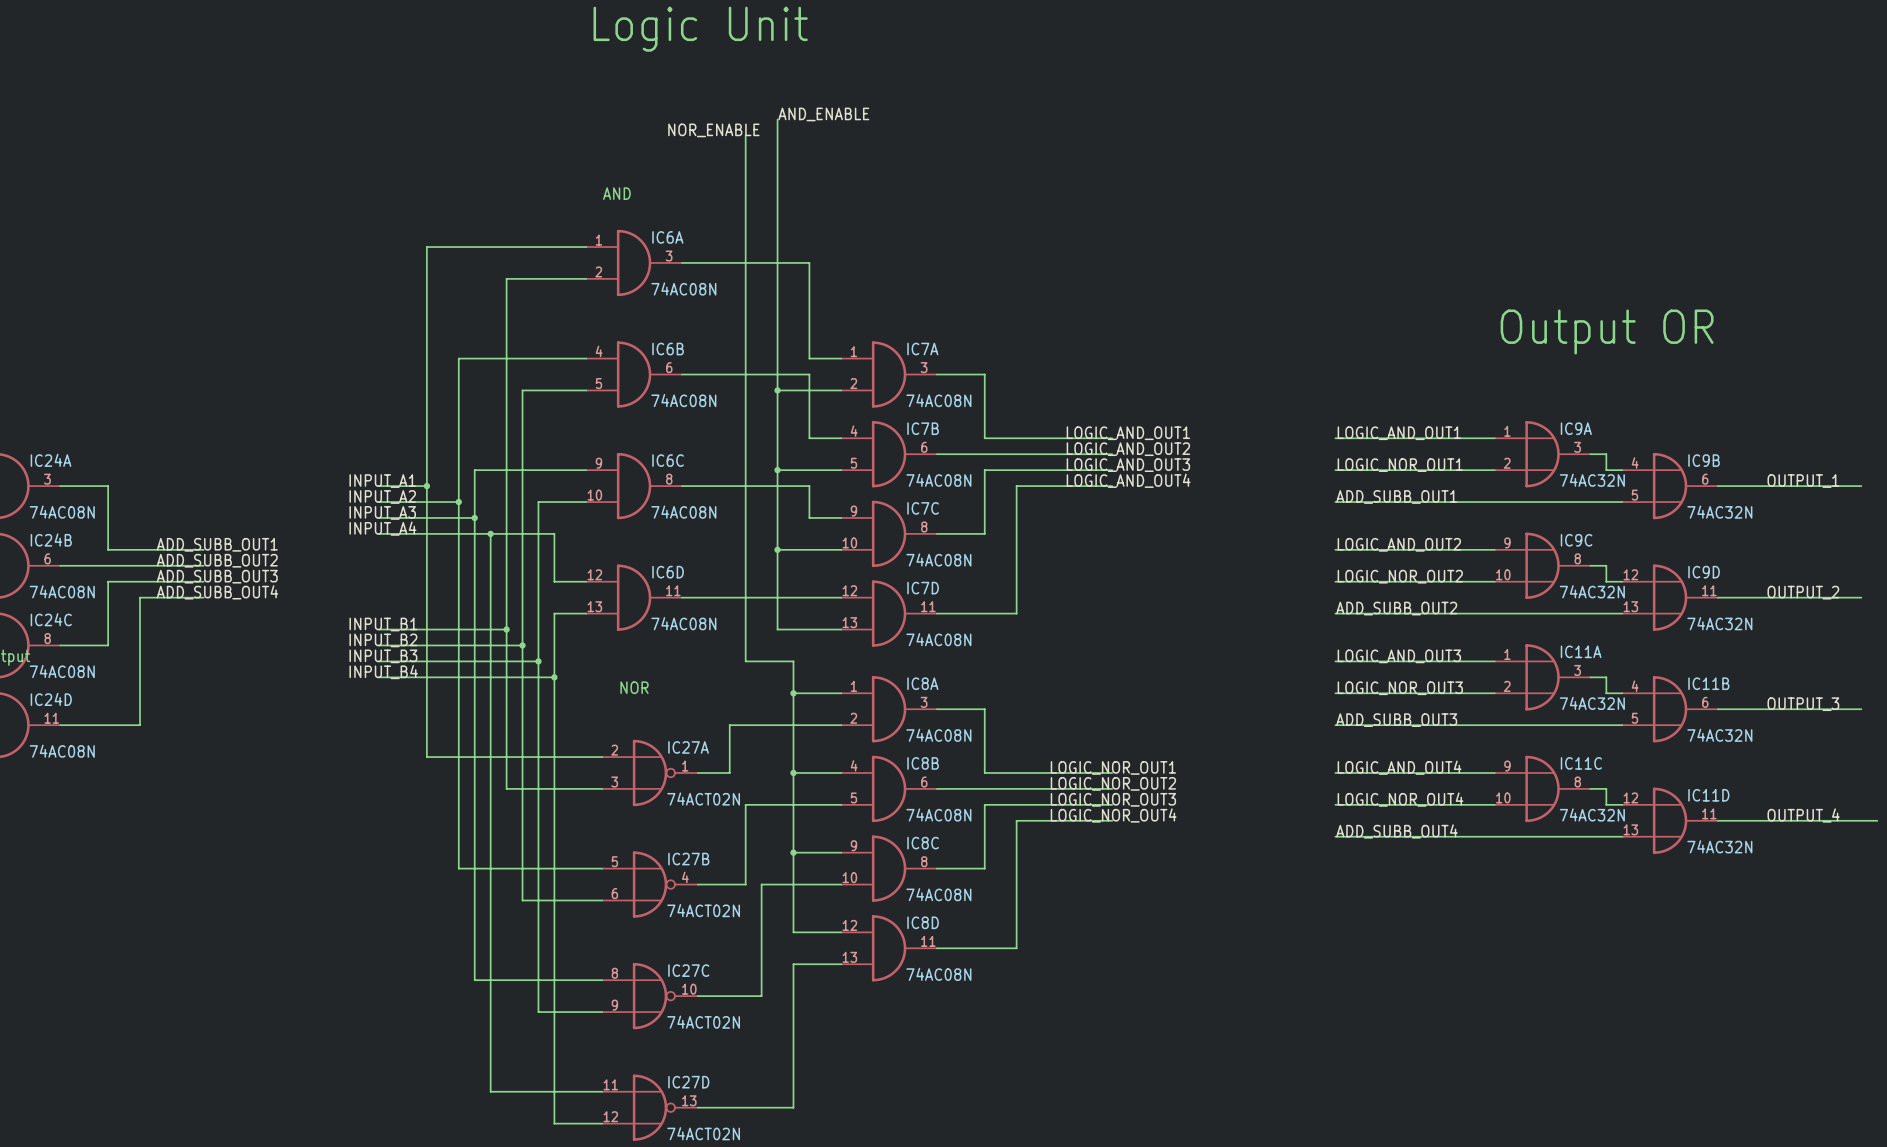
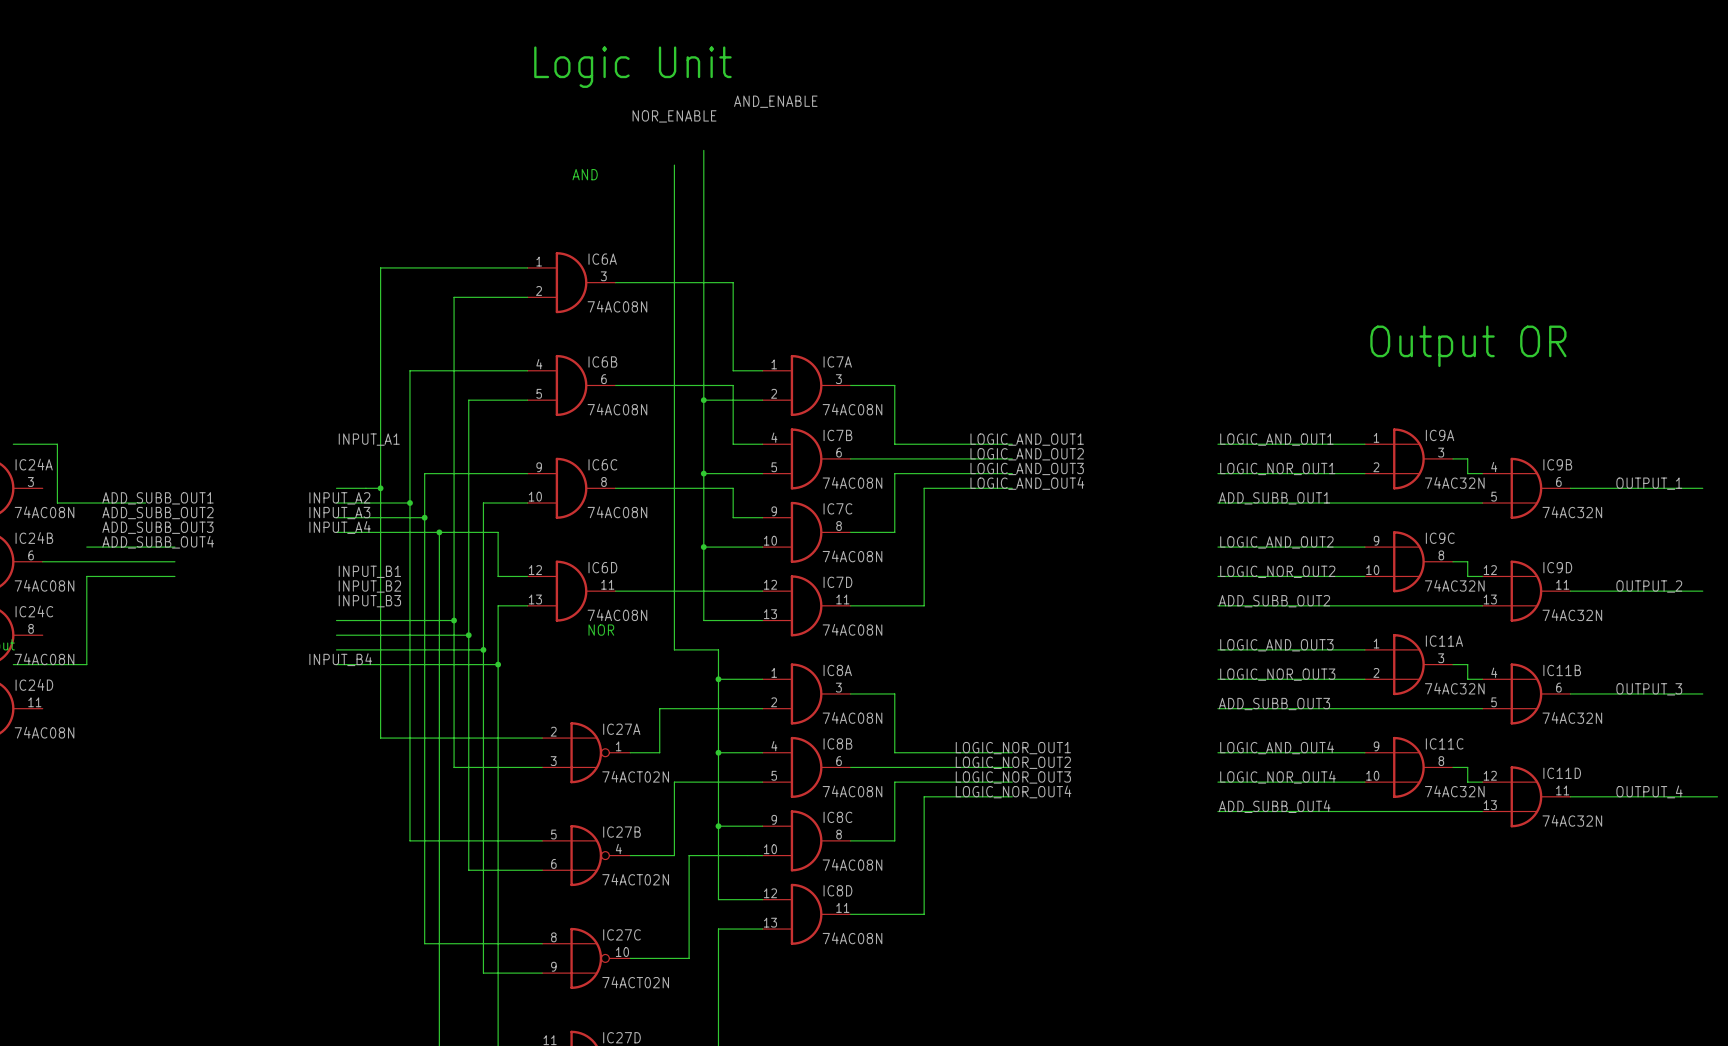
label position: AND_ENABLE (823, 114) -> AND_ENABLE (775, 101)
label position: NOR_ENABLE (713, 130) -> NOR_ENABLE (674, 116)
text position: AND (616, 193) -> AND (585, 174)
wire: none -> (13, 444) (57, 444) (57, 503) (145, 503)
label position: INPUT_A1 (382, 481) -> INPUT_A1 (369, 439)
wire: (60, 486) (108, 486) (108, 549) -> none
label position: ADD_SUBB_OUT1 (217, 544) -> ADD_SUBB_OUT1 (157, 498)
label position: ADD_SUBB_OUT2 (217, 560) -> ADD_SUBB_OUT2 (157, 513)
label position: ADD_SUBB_OUT3 (217, 576) -> ADD_SUBB_OUT3 (157, 527)
label position: ADD_SUBB_OUT4 (217, 592) -> ADD_SUBB_OUT4 (158, 542)
wire: (203, 597) (140, 597) (140, 725) (60, 725) -> none
label position: INPUT_B1 (383, 624) -> INPUT_B1 (369, 571)
label position: INPUT_B2 (383, 640) -> INPUT_B2 (369, 586)
wire: (60, 645) (108, 645) -> (13, 664) (86, 664) (86, 635)
label position: INPUT_B3 (383, 656) -> INPUT_B3 (369, 601)
text position: NOR (634, 687) -> NOR (601, 630)

